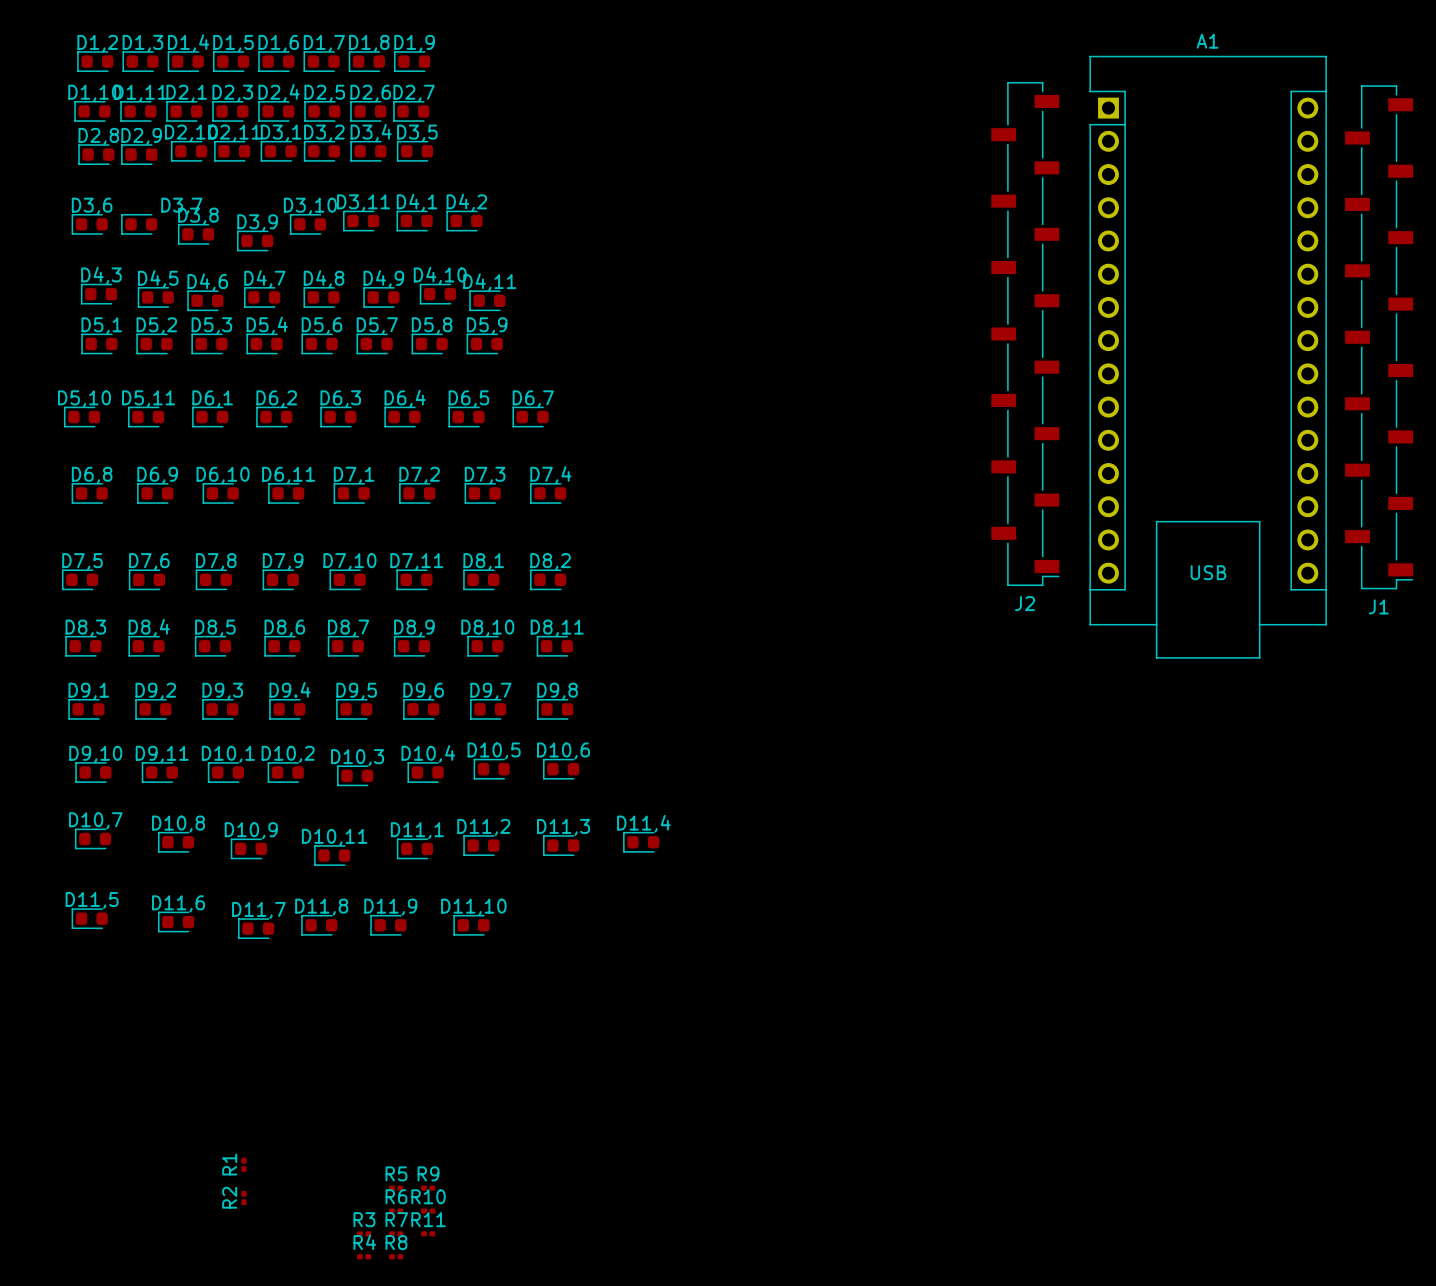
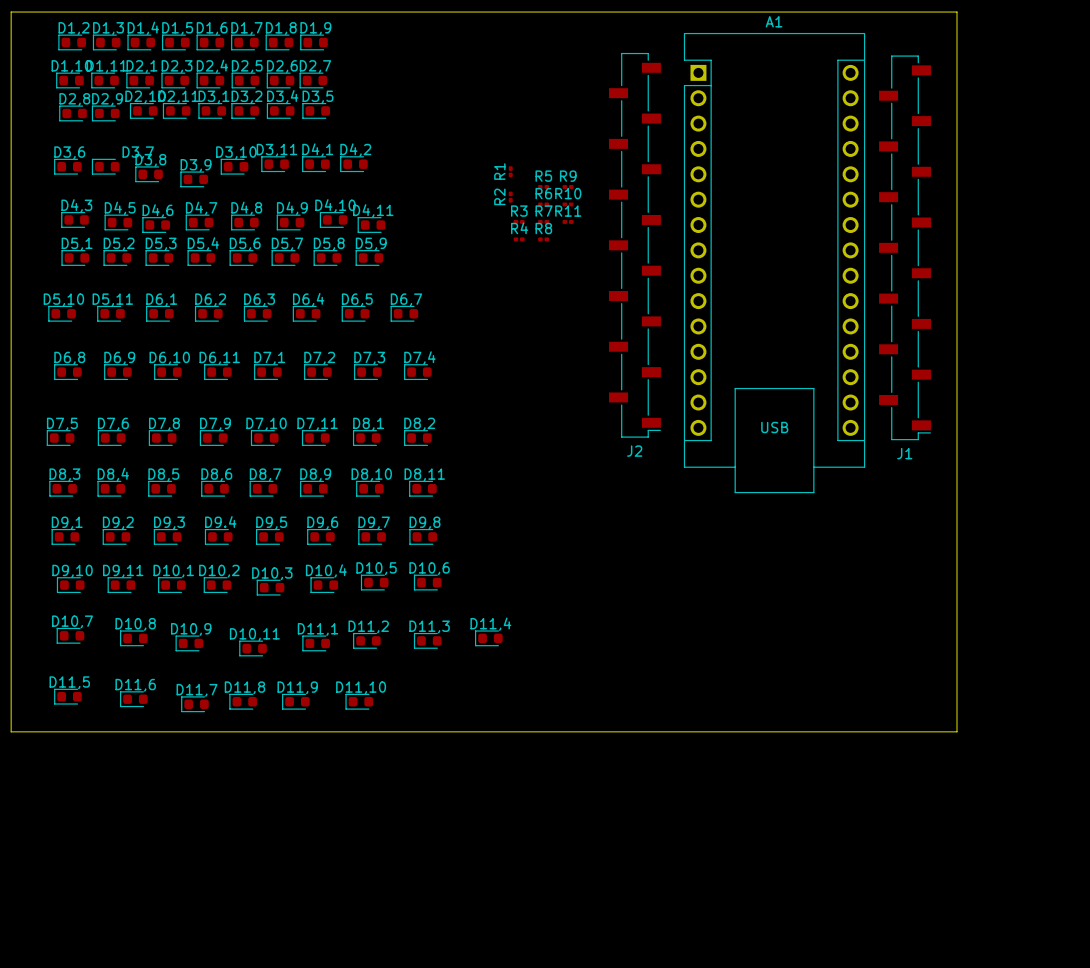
board edge: none -> (11, 12) (957, 12) (957, 731) (11, 731) (11, 12)
J2 position: (1025, 333) -> (634, 245)
J1 position: (1379, 337) -> (905, 247)
A1 position: (1208, 357) -> (774, 263)
R1 position: (243, 1164) -> (510, 171)
R5 position: (396, 1188) -> (543, 186)
R9 position: (428, 1188) -> (568, 186)
R2 position: (243, 1198) -> (510, 197)
R6 position: (396, 1211) -> (543, 204)
R10 position: (428, 1211) -> (568, 204)
R3 position: (364, 1233) -> (519, 221)
R7 position: (396, 1233) -> (543, 221)
R11 position: (428, 1233) -> (568, 221)
R4 position: (364, 1256) -> (519, 239)
R8 position: (396, 1256) -> (543, 239)

